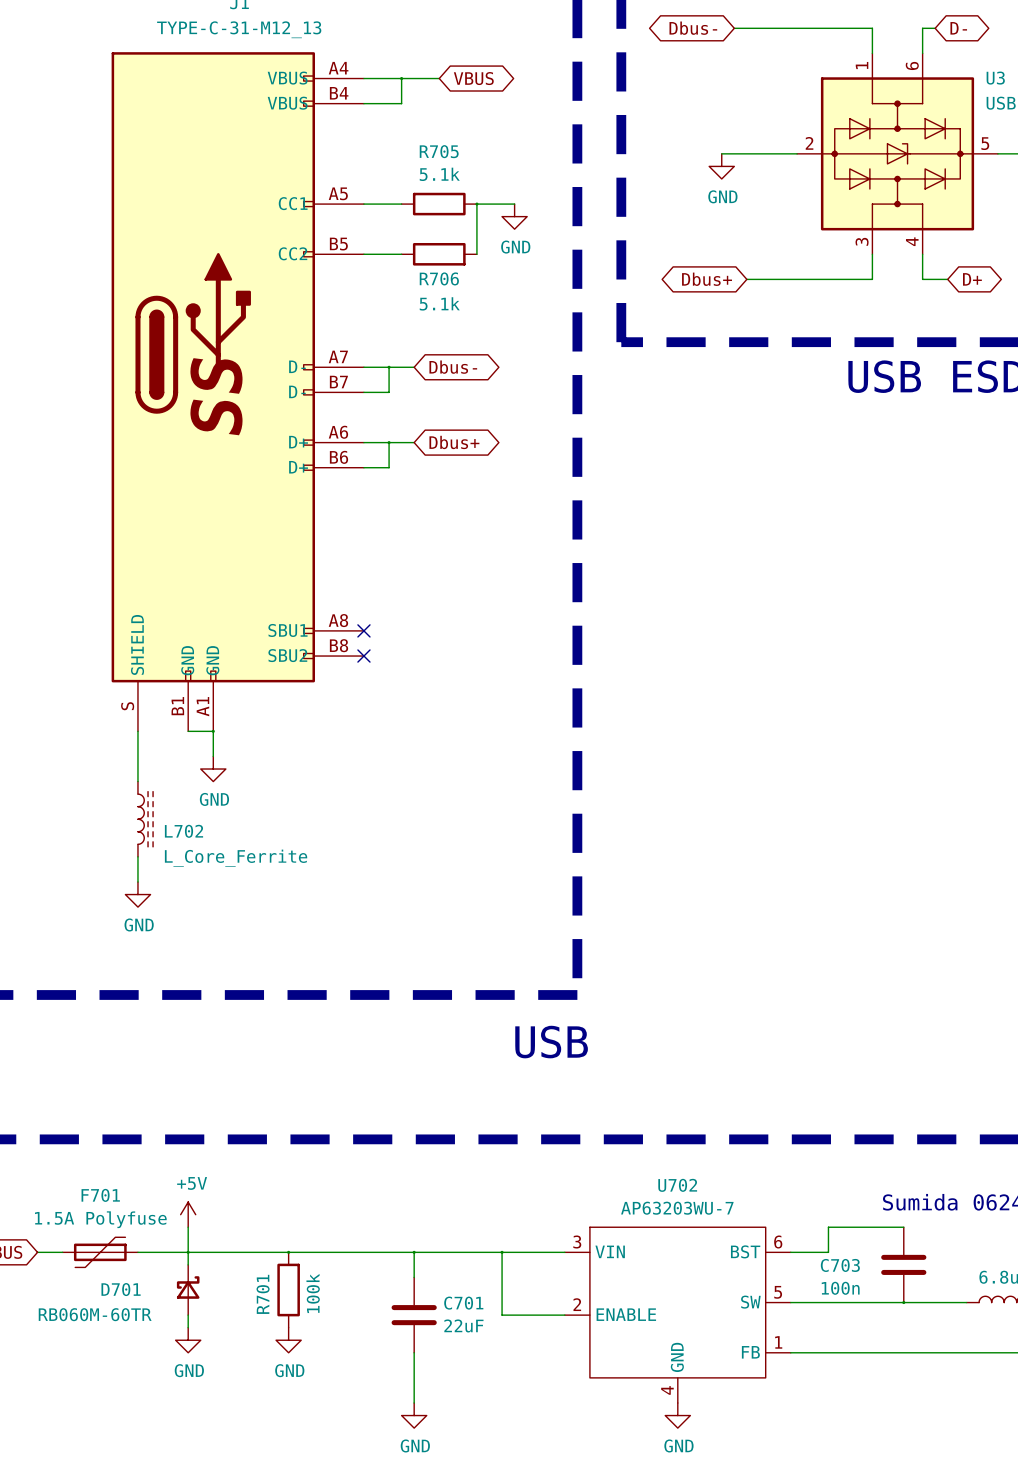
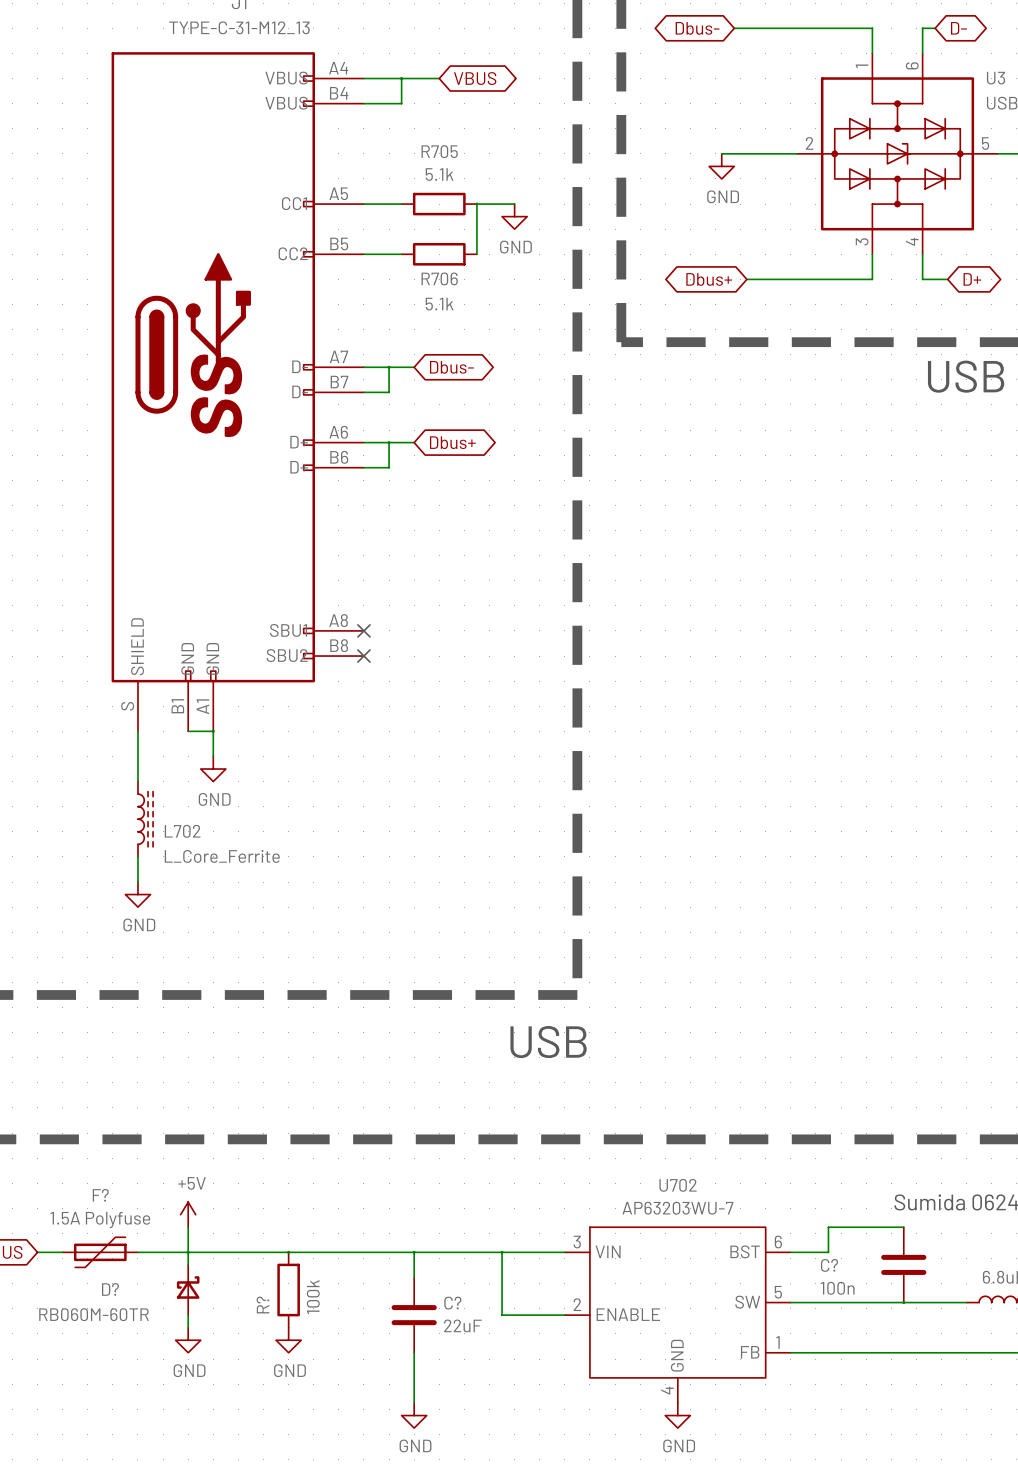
F701 name: F701 (100, 1195) -> F? (100, 1195)
C703 name: C703 (840, 1265) -> C? (829, 1265)
D701 name: D701 (121, 1289) -> D? (110, 1289)
R701 name: R701 (263, 1294) -> R? (262, 1305)
C701 name: C701 (463, 1303) -> C? (452, 1303)

